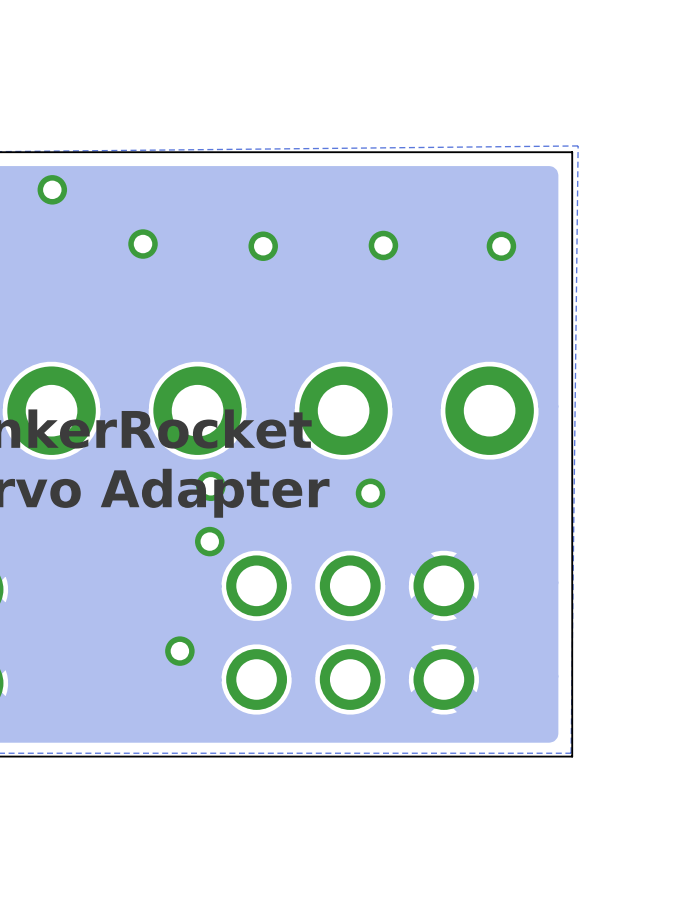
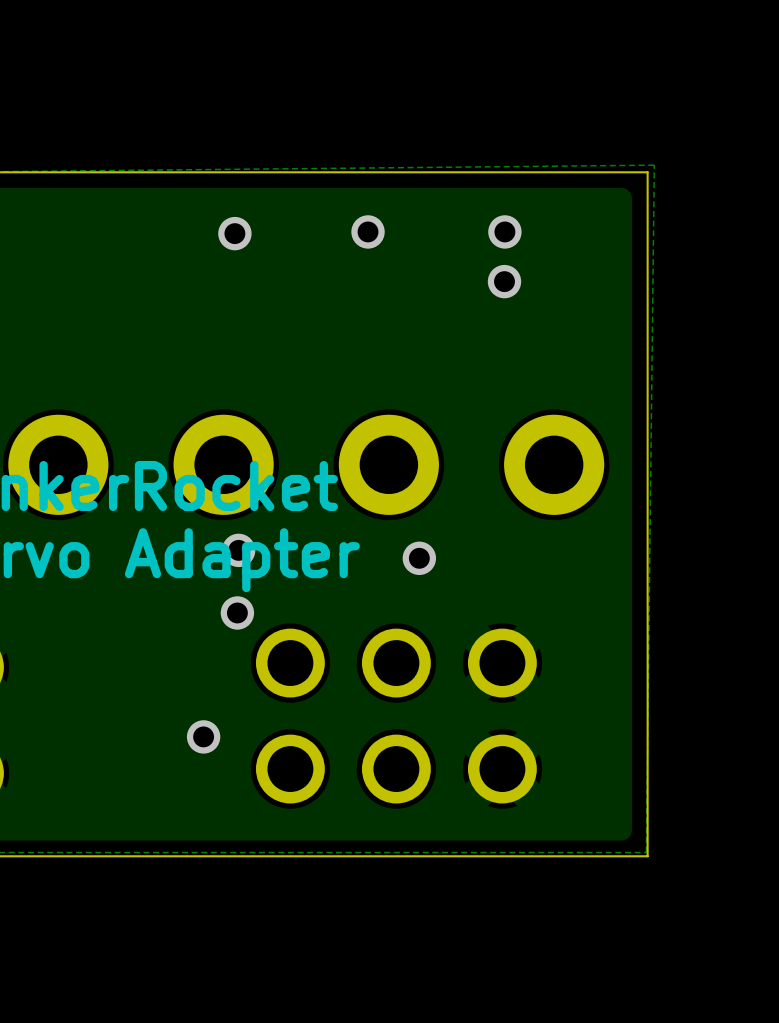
via: (52, 189) -> none
via: none -> (368, 231)
via: none -> (504, 231)
via: none -> (234, 233)
via: (143, 244) -> none
via: (383, 245) -> none
via: (263, 246) -> none
via: (501, 246) -> none
via: none -> (504, 281)

